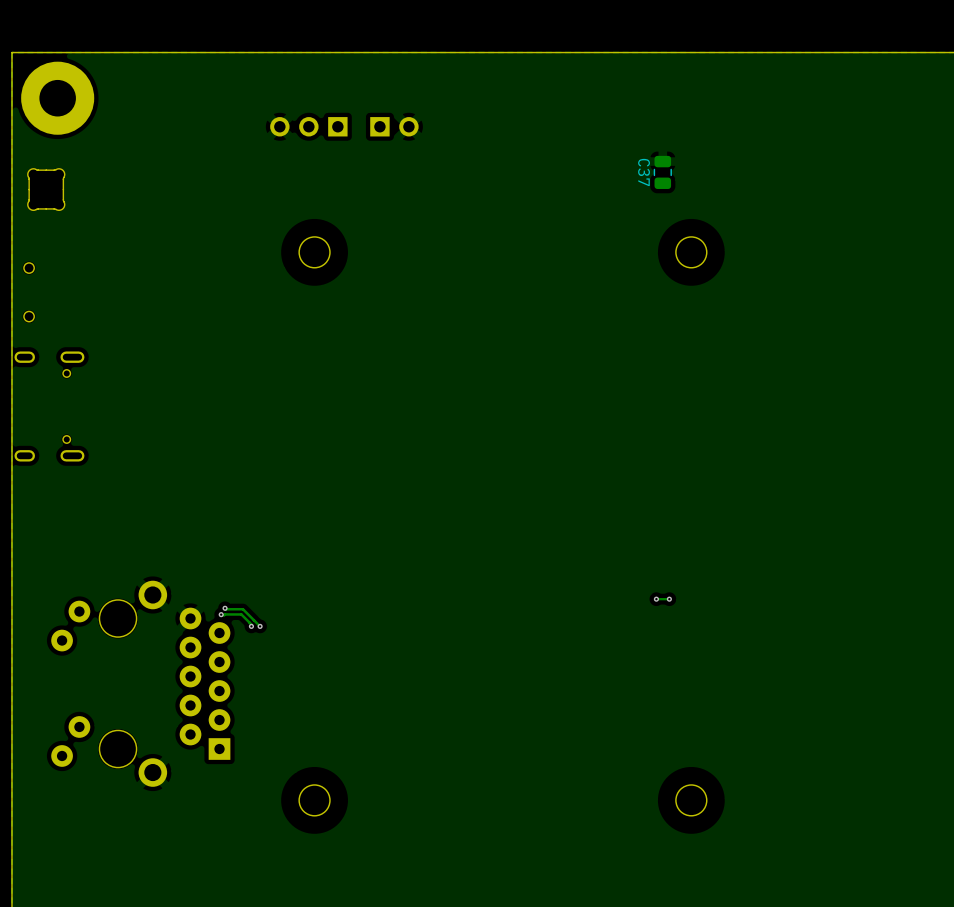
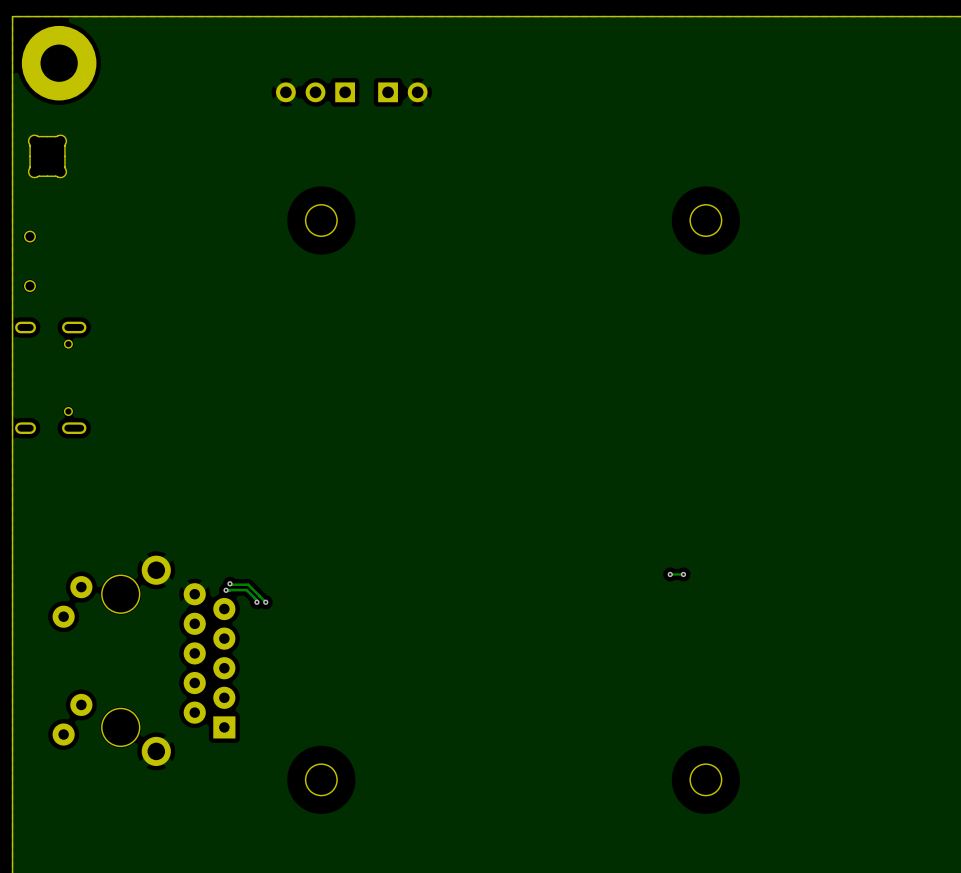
C37: (662, 172) -> none

